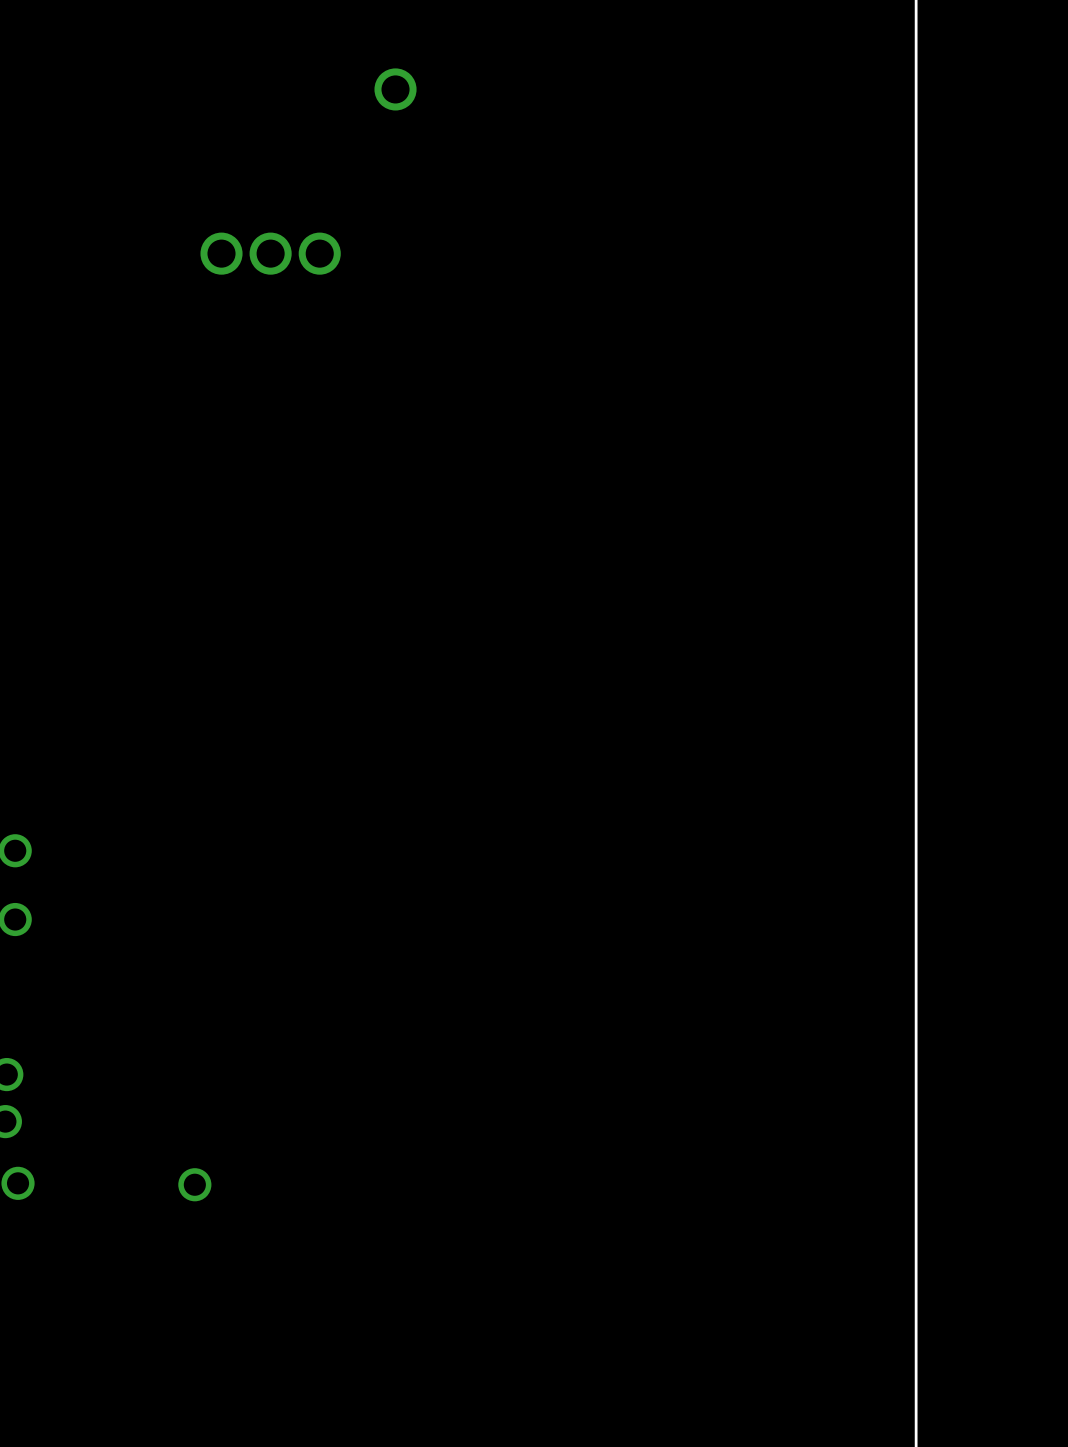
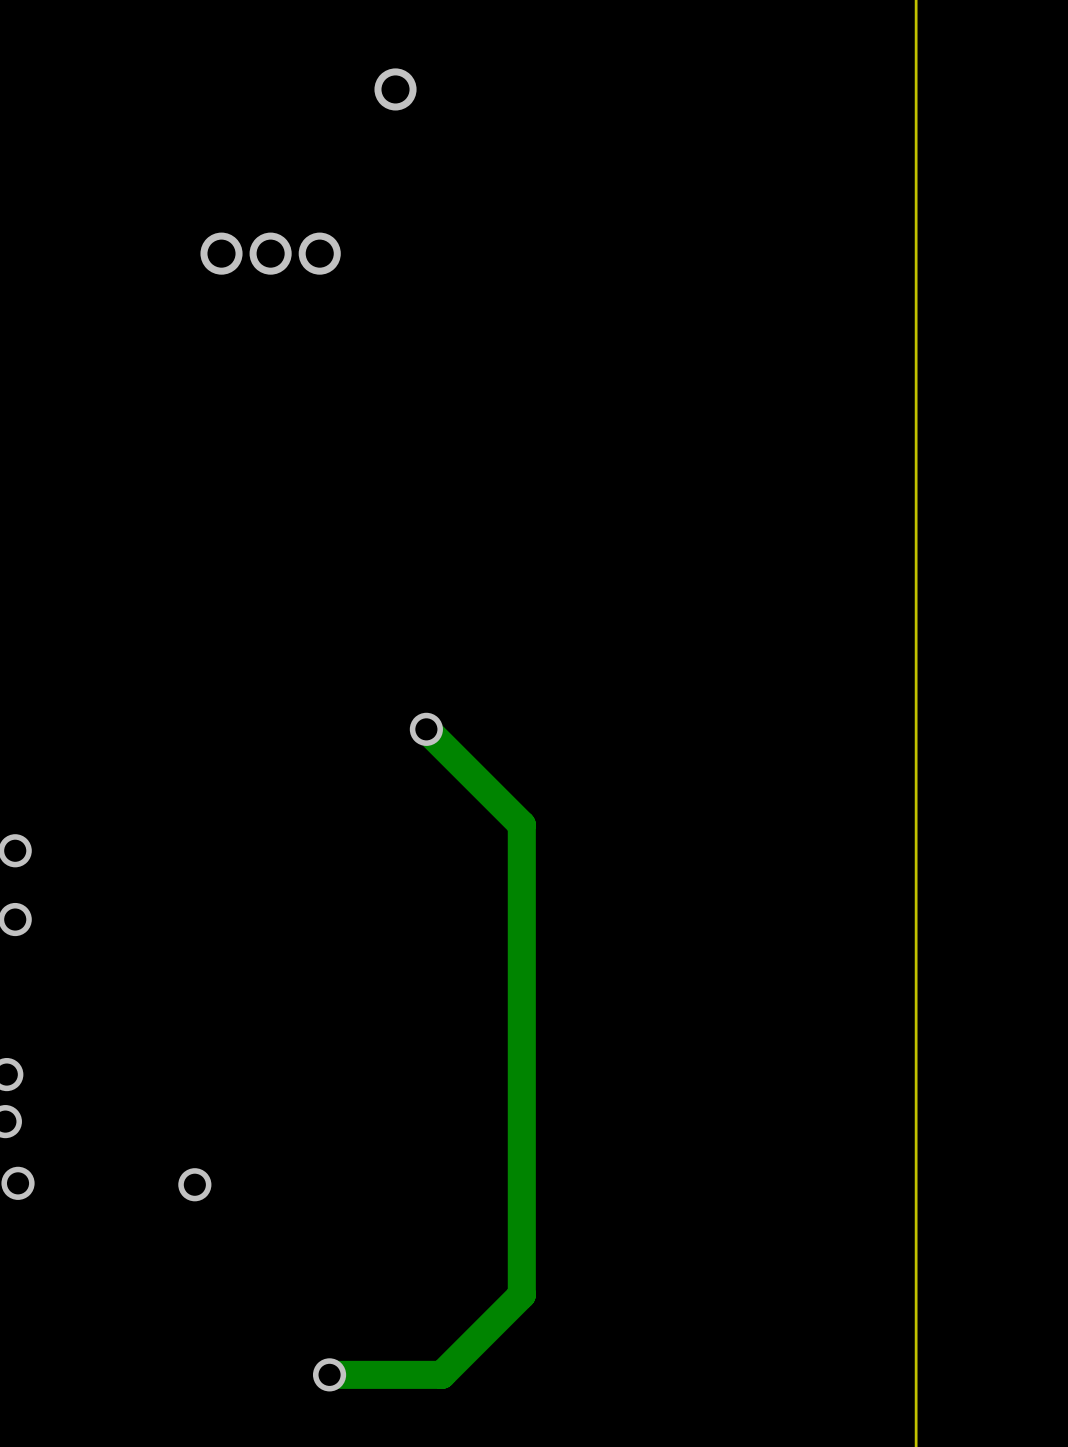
track: none -> (426, 729) (521, 824) (521, 1294) (441, 1374) (329, 1374)
via: none -> (426, 729)
via: none -> (329, 1374)

